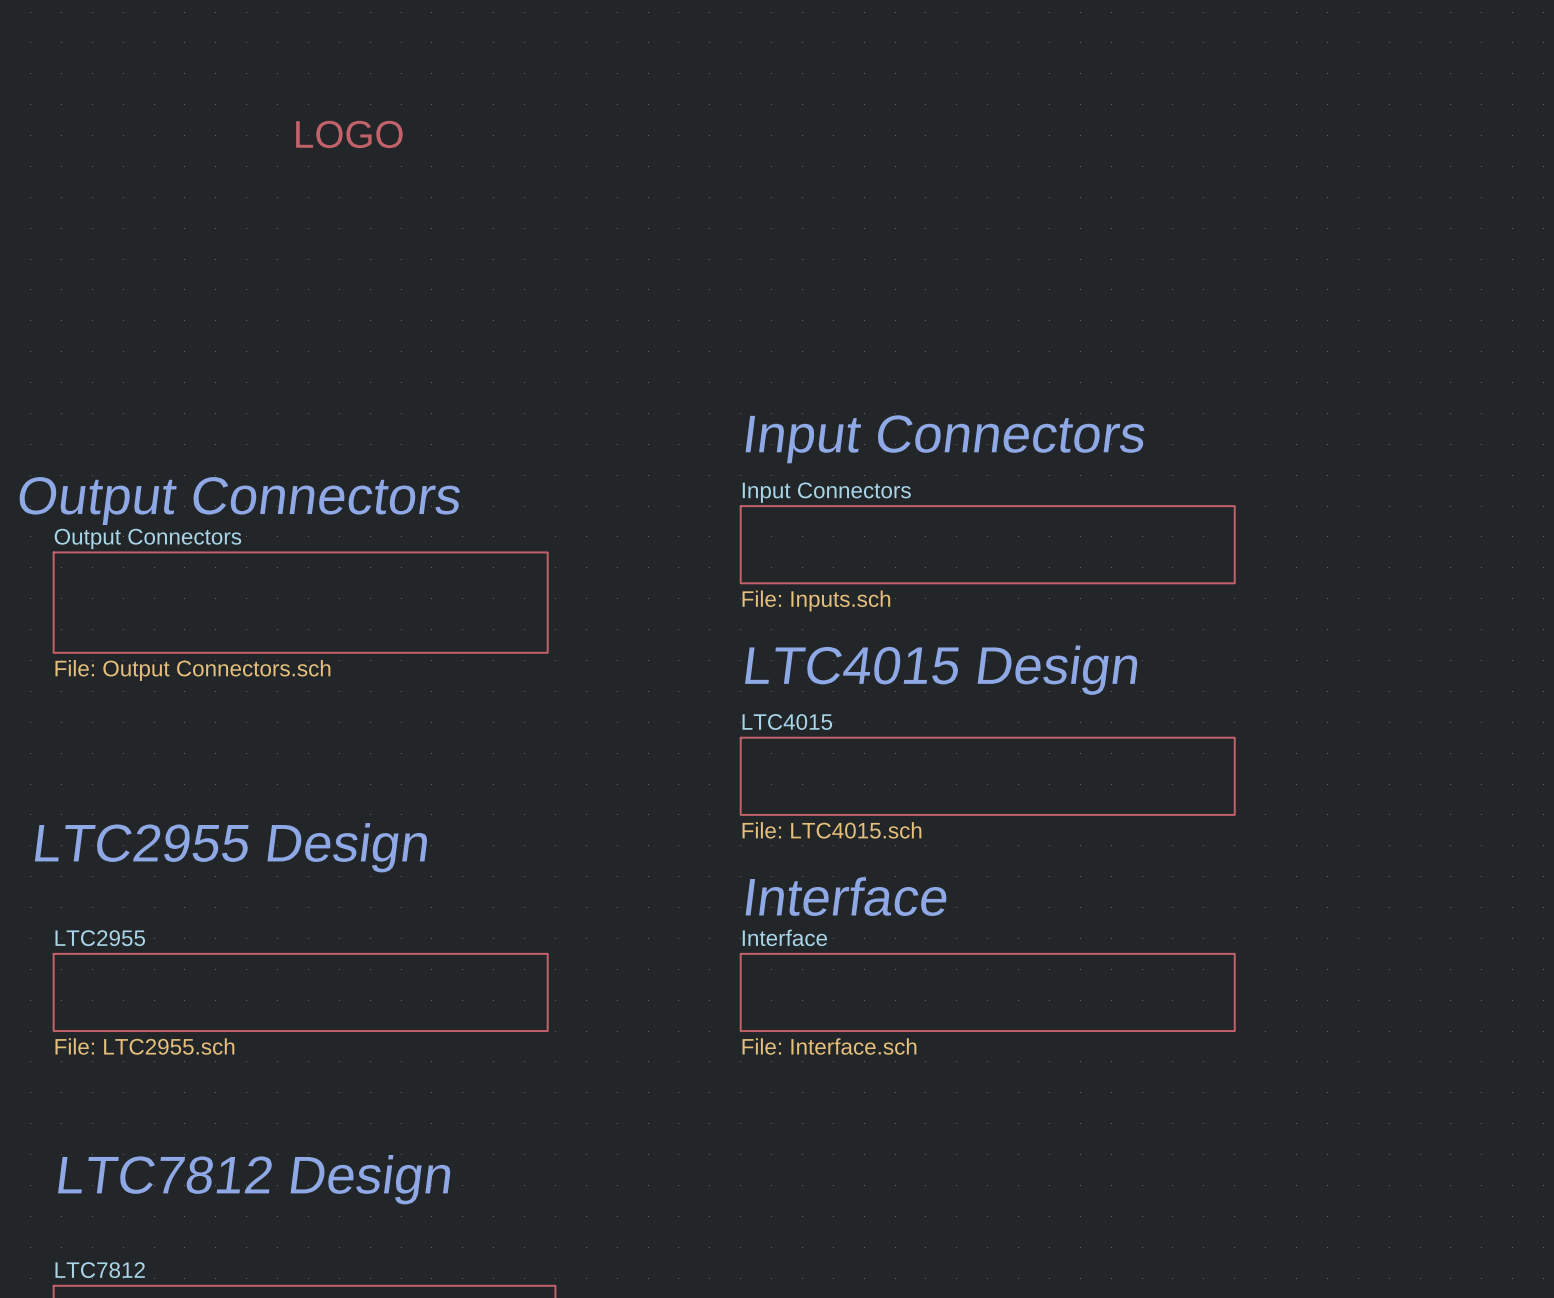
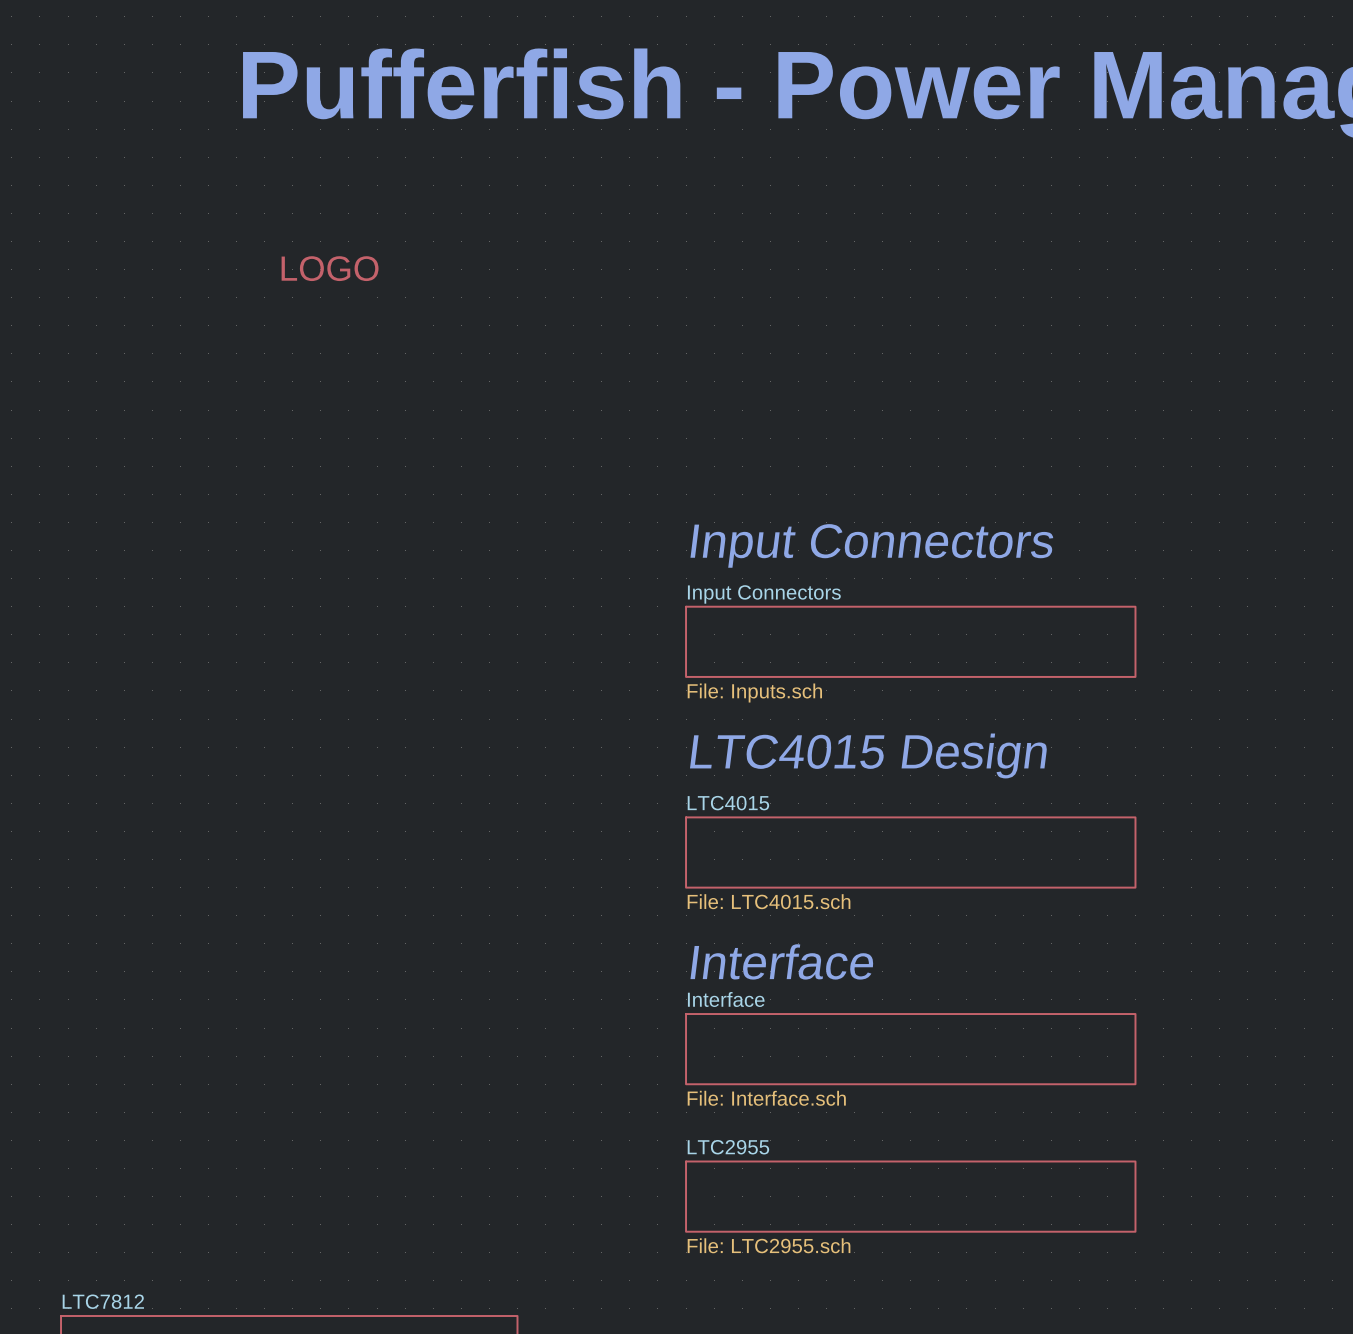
text: Output Connectors (239, 501) -> none
sheet Output Connectors: File: Output Connectors.sch (300, 602) -> none
text: LTC2955 Design (231, 847) -> none
sheet LTC2955 position: (300, 992) -> (910, 1196)
text: LTC7812 Design (254, 1179) -> none

